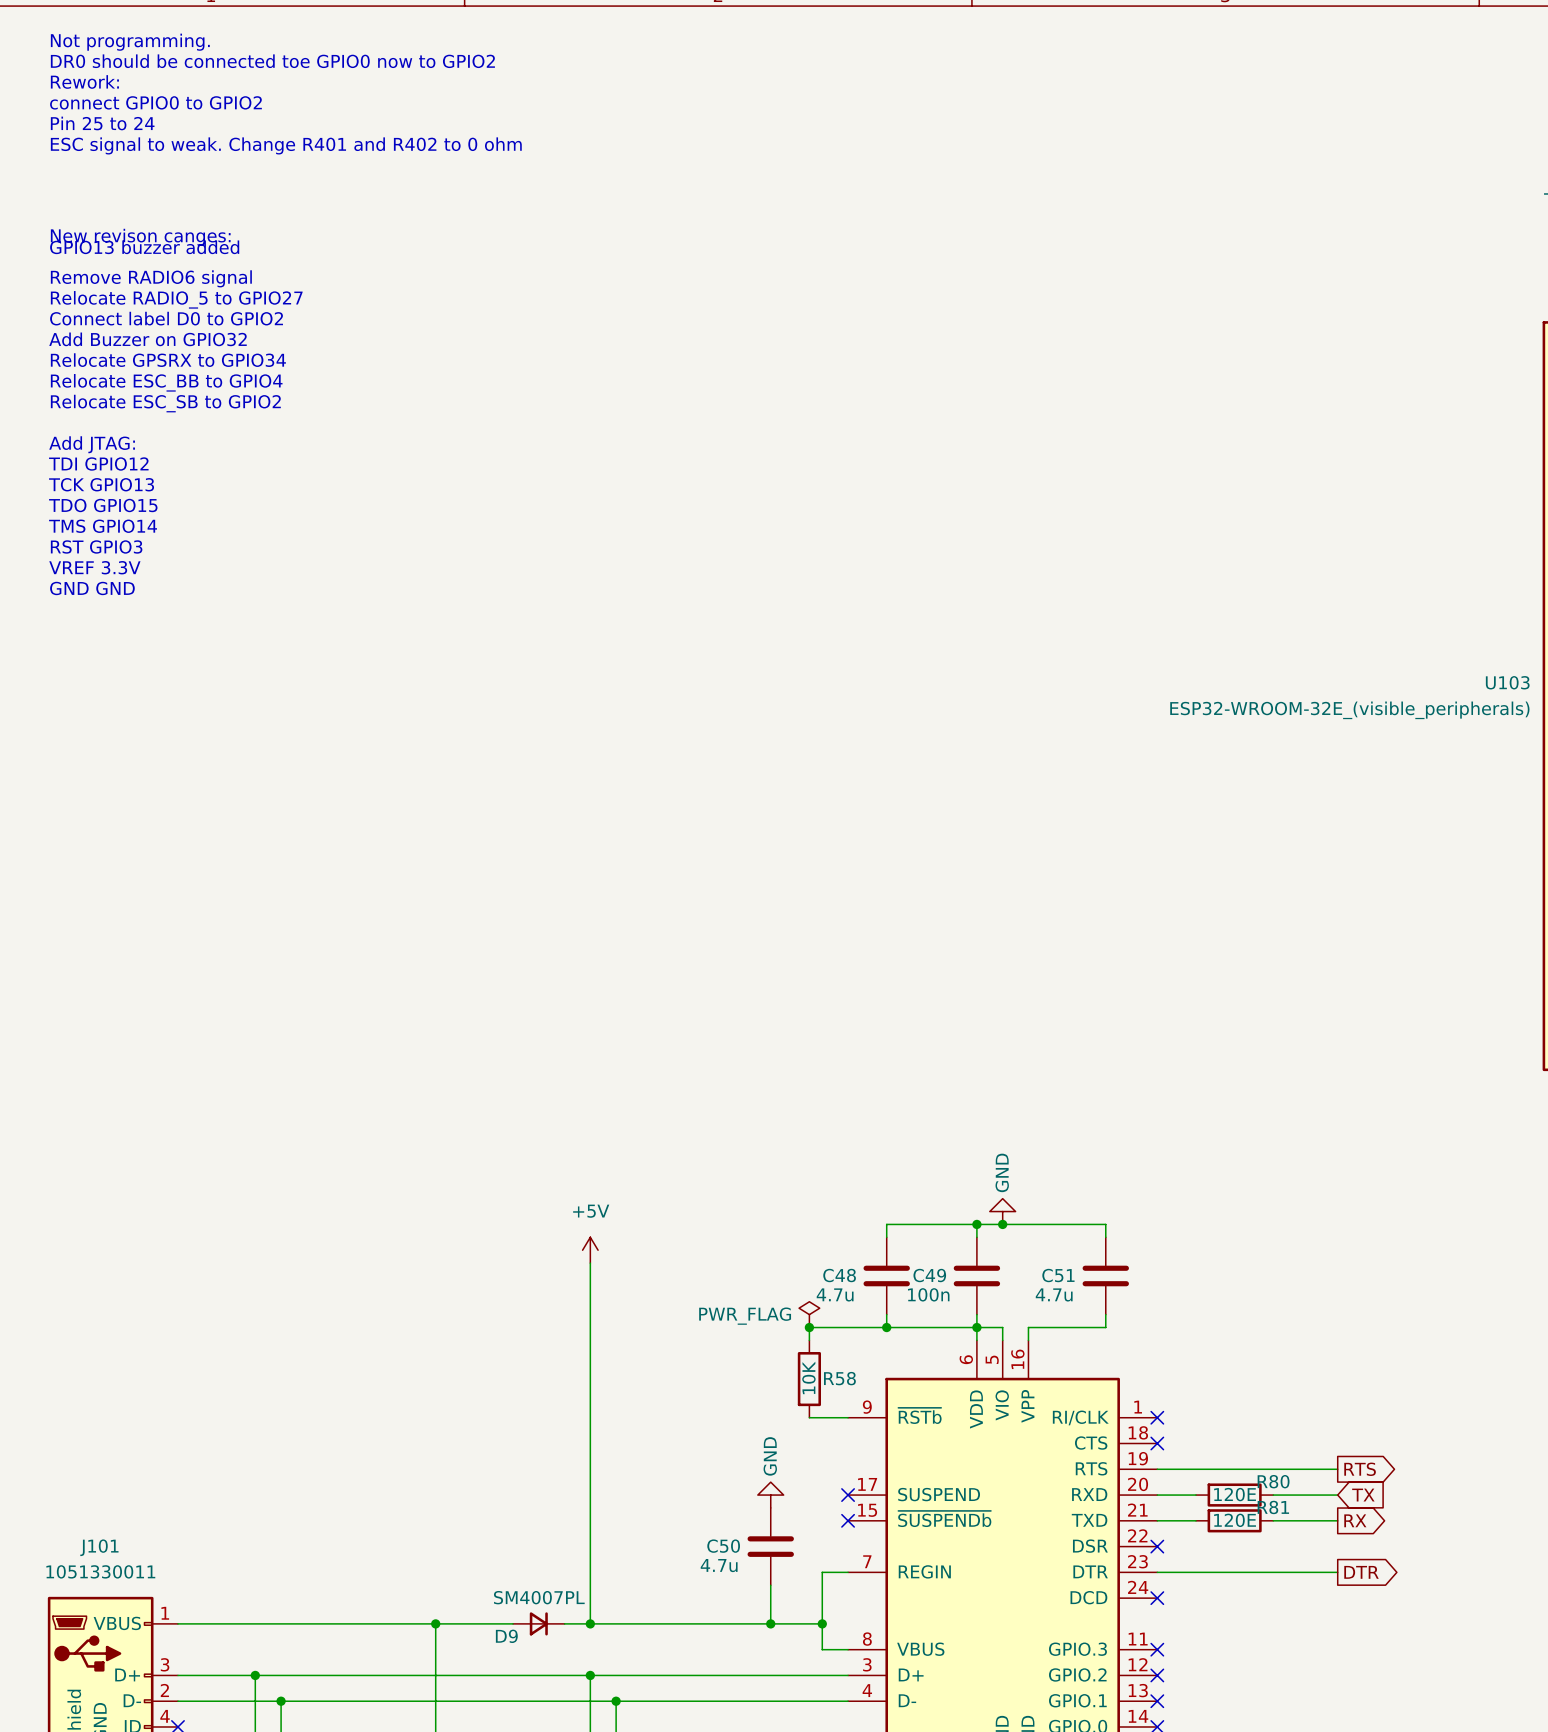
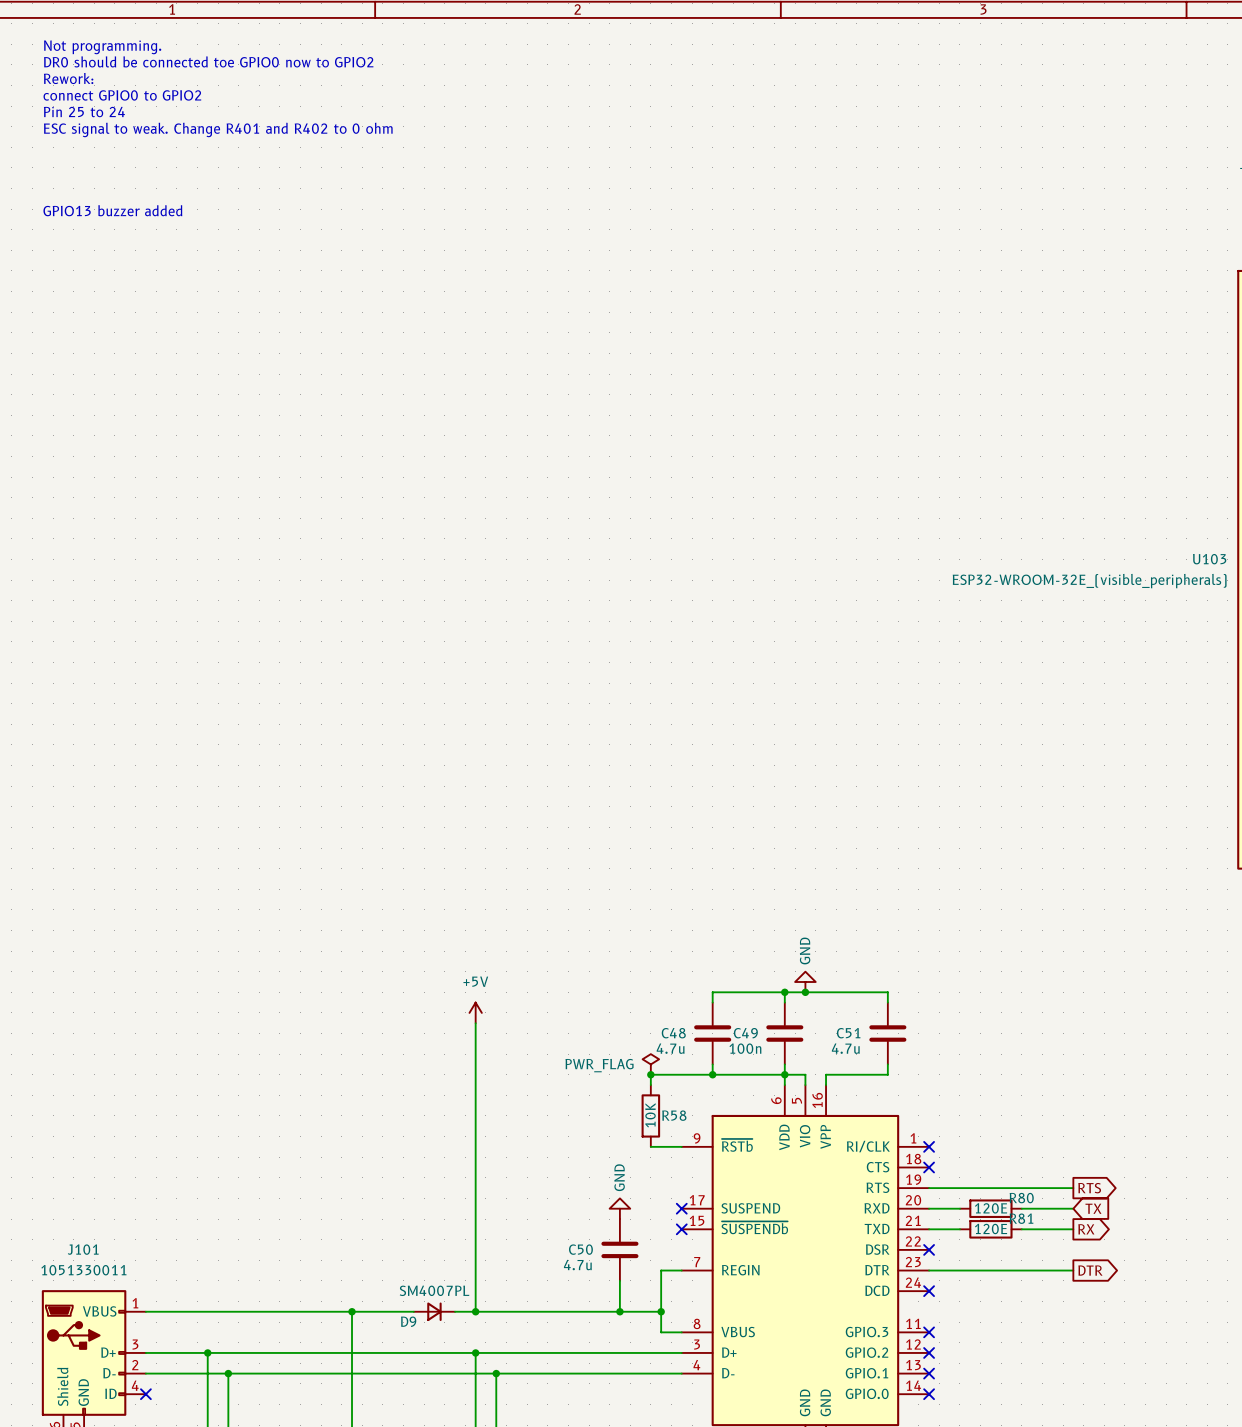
text: New revison canges: (140, 237) -> none
text: Remove RADIO6 signal (151, 278) -> none
text: Relocate RADIO_5 to GPIO27 (176, 299) -> none
text: Connect label D0 to GPIO2 (166, 318) -> none
text: Add Buzzer on GPIO32 (148, 339) -> none
text: Relocate GPSRX to GPIO34 (168, 360) -> none
text: Relocate ESC_BB to GPIO4 (166, 382) -> none
text: Relocate ESC_SB to GPIO2 (165, 403) -> none
text: Add JTAG: (92, 444) -> none
text: TDI GPIO12 (98, 464) -> none
text: TCK GPIO13 (101, 484) -> none
text: TDO GPIO15 (103, 505) -> none
text: TMS GPIO14 (103, 526) -> none
text: RST GPIO3 (96, 546) -> none
text: VREF 3.3V (94, 567) -> none
text: GND GND (92, 588) -> none

